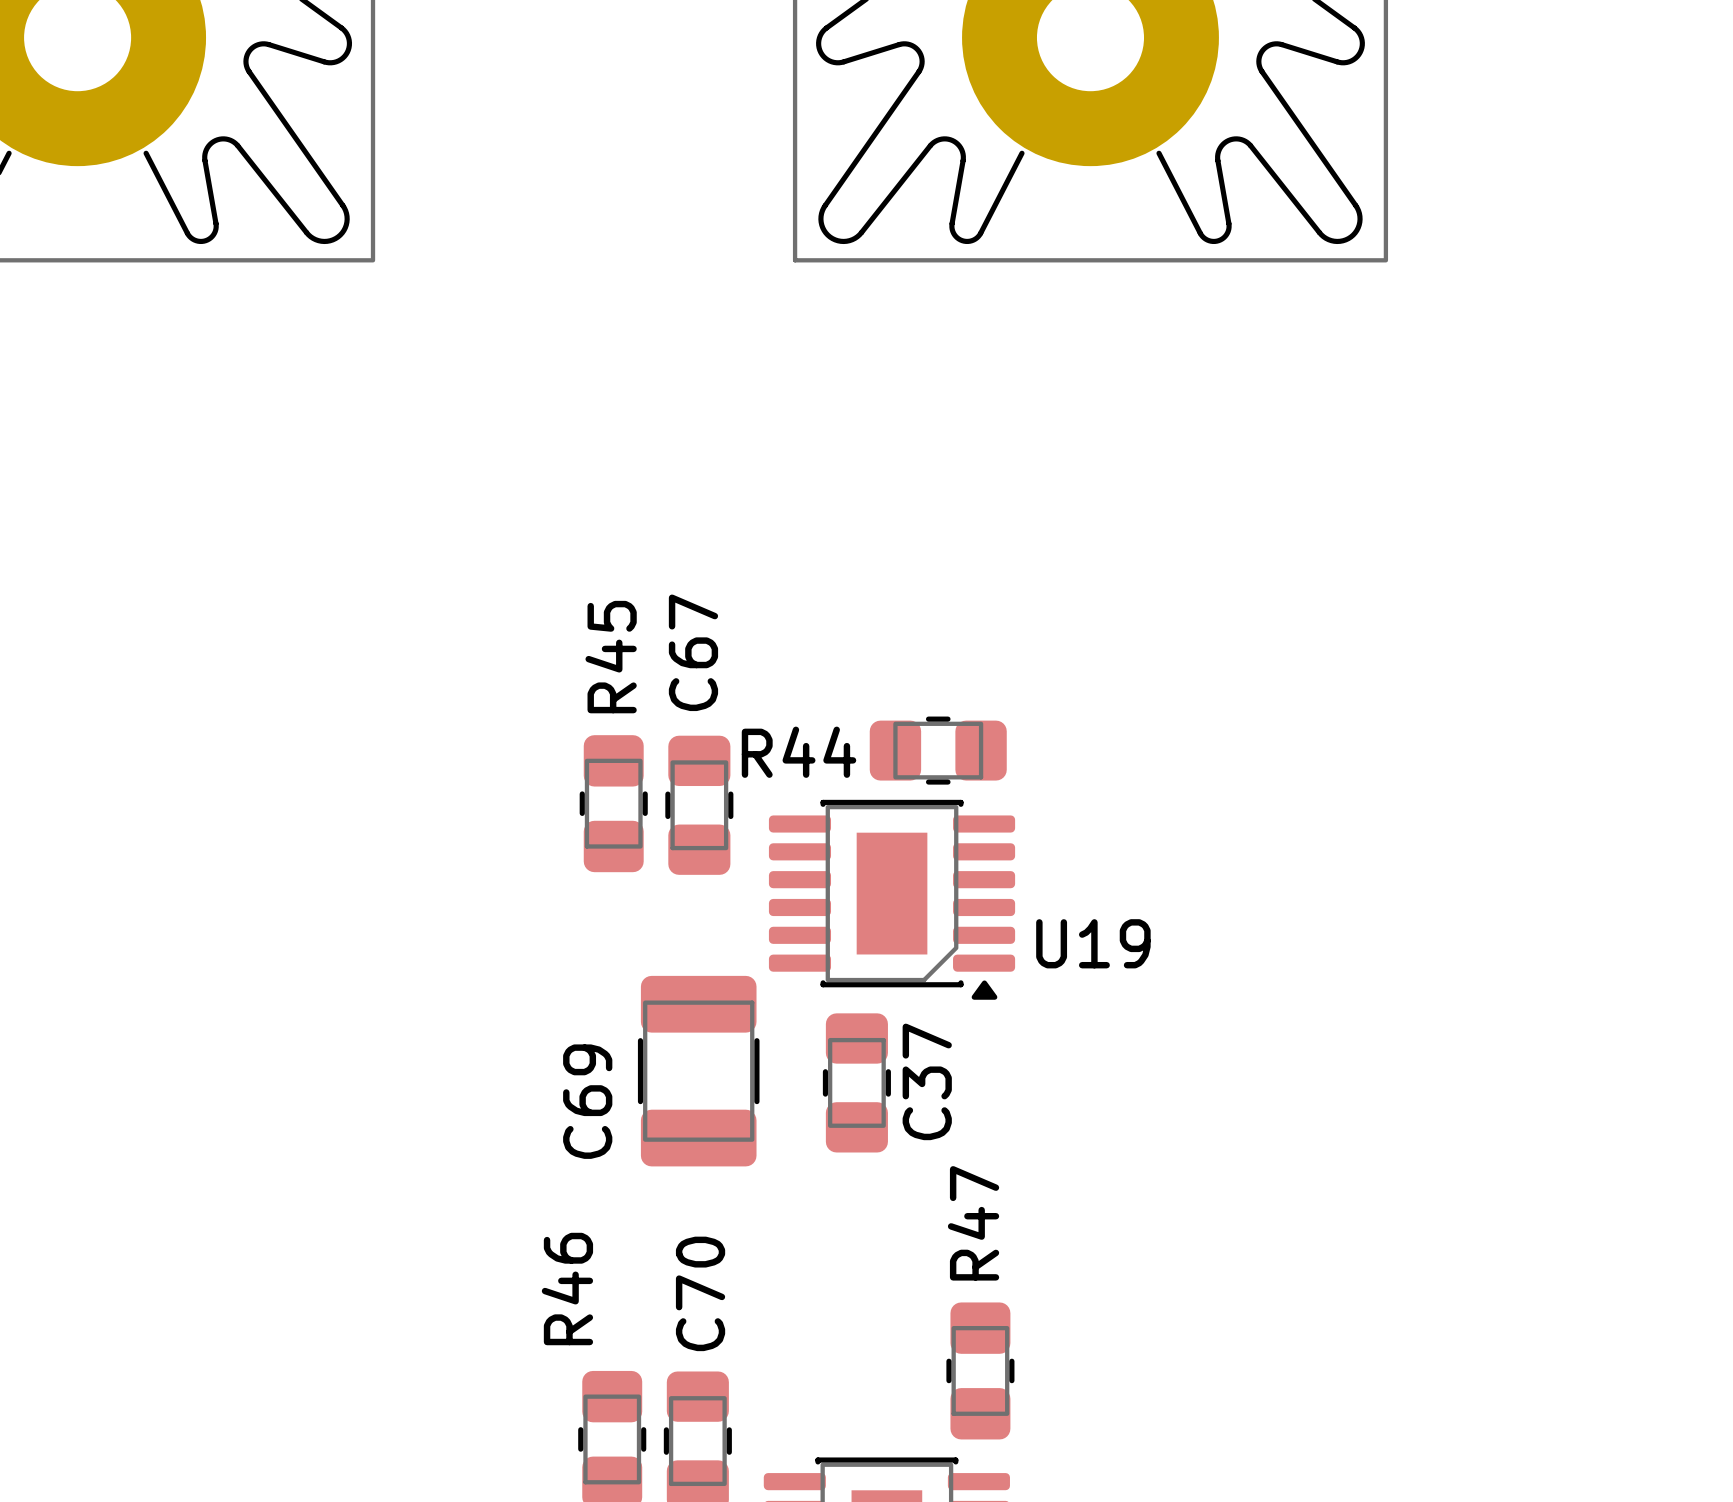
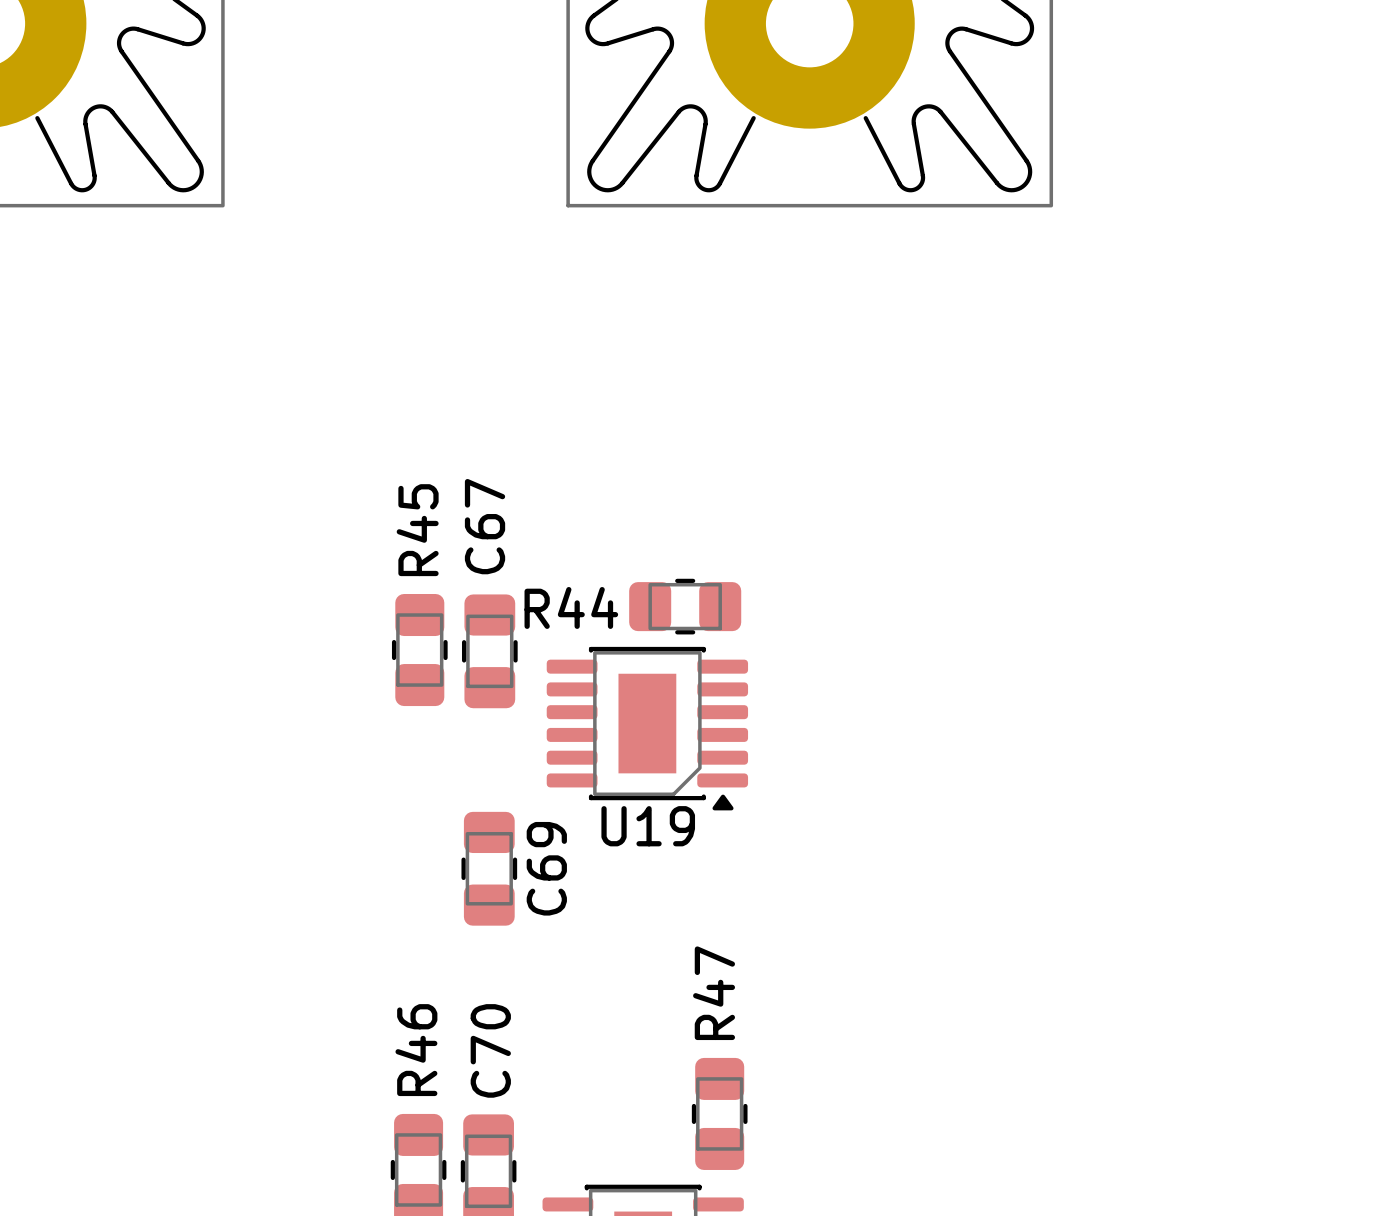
U19 name position: U19 (1093, 943) -> U19 (648, 826)
C69 footprint: [637, 975, 760, 1167] -> [461, 811, 518, 926]
C37: (856, 1082) -> none
C69 name position: C69 (587, 1101) -> C69 (546, 868)
R46 name position: R46 (567, 1289) -> R46 (416, 1050)

